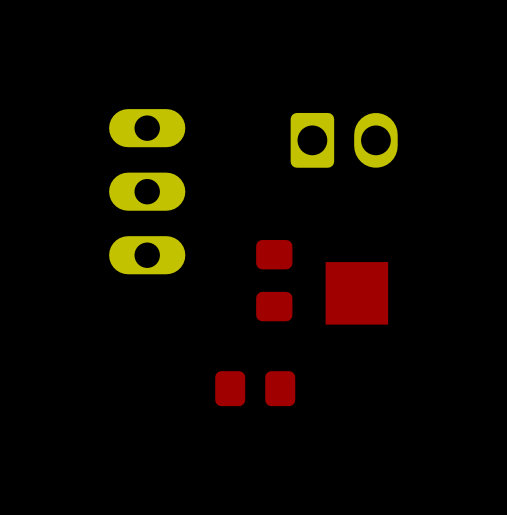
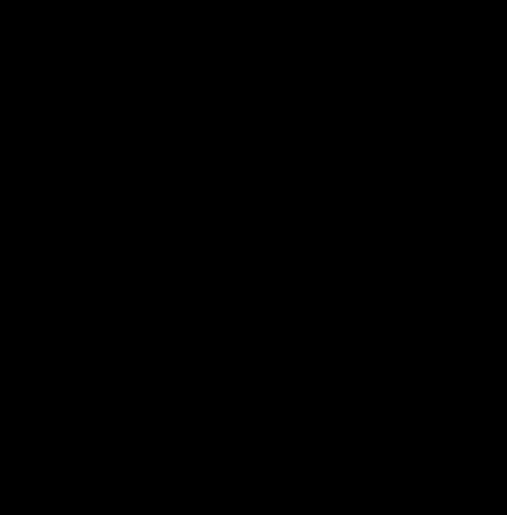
part: (344, 140) -> none
part: (147, 191) -> none
part: (274, 280) -> none
part: (356, 293) -> none
part: (255, 388) -> none

